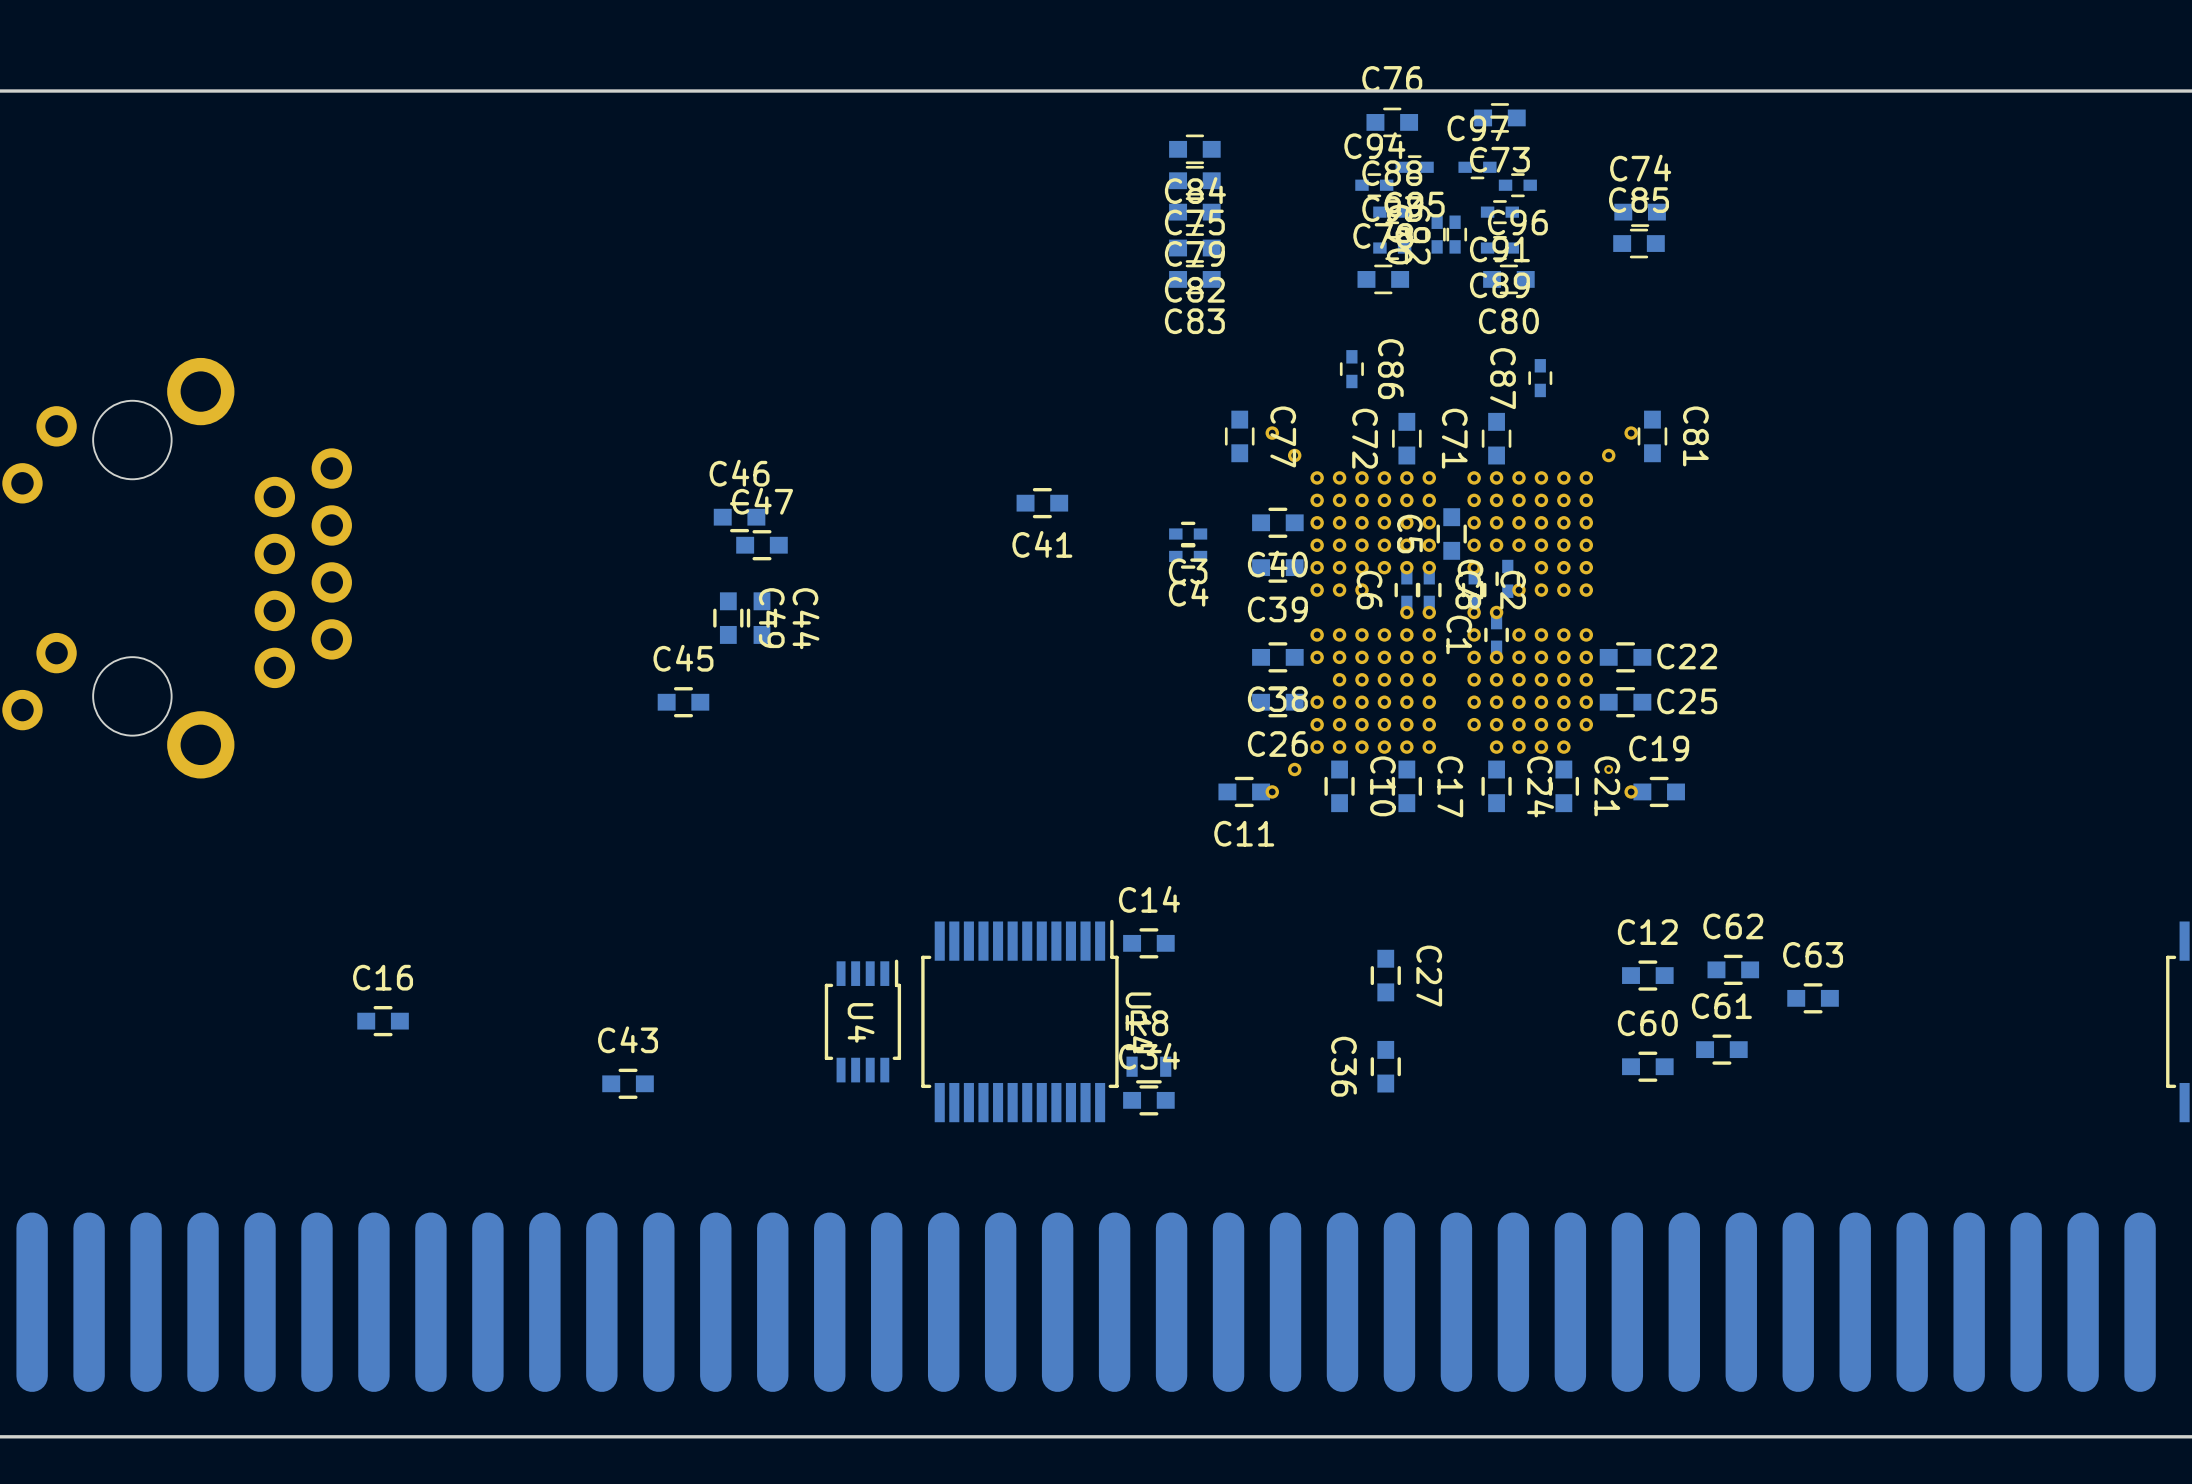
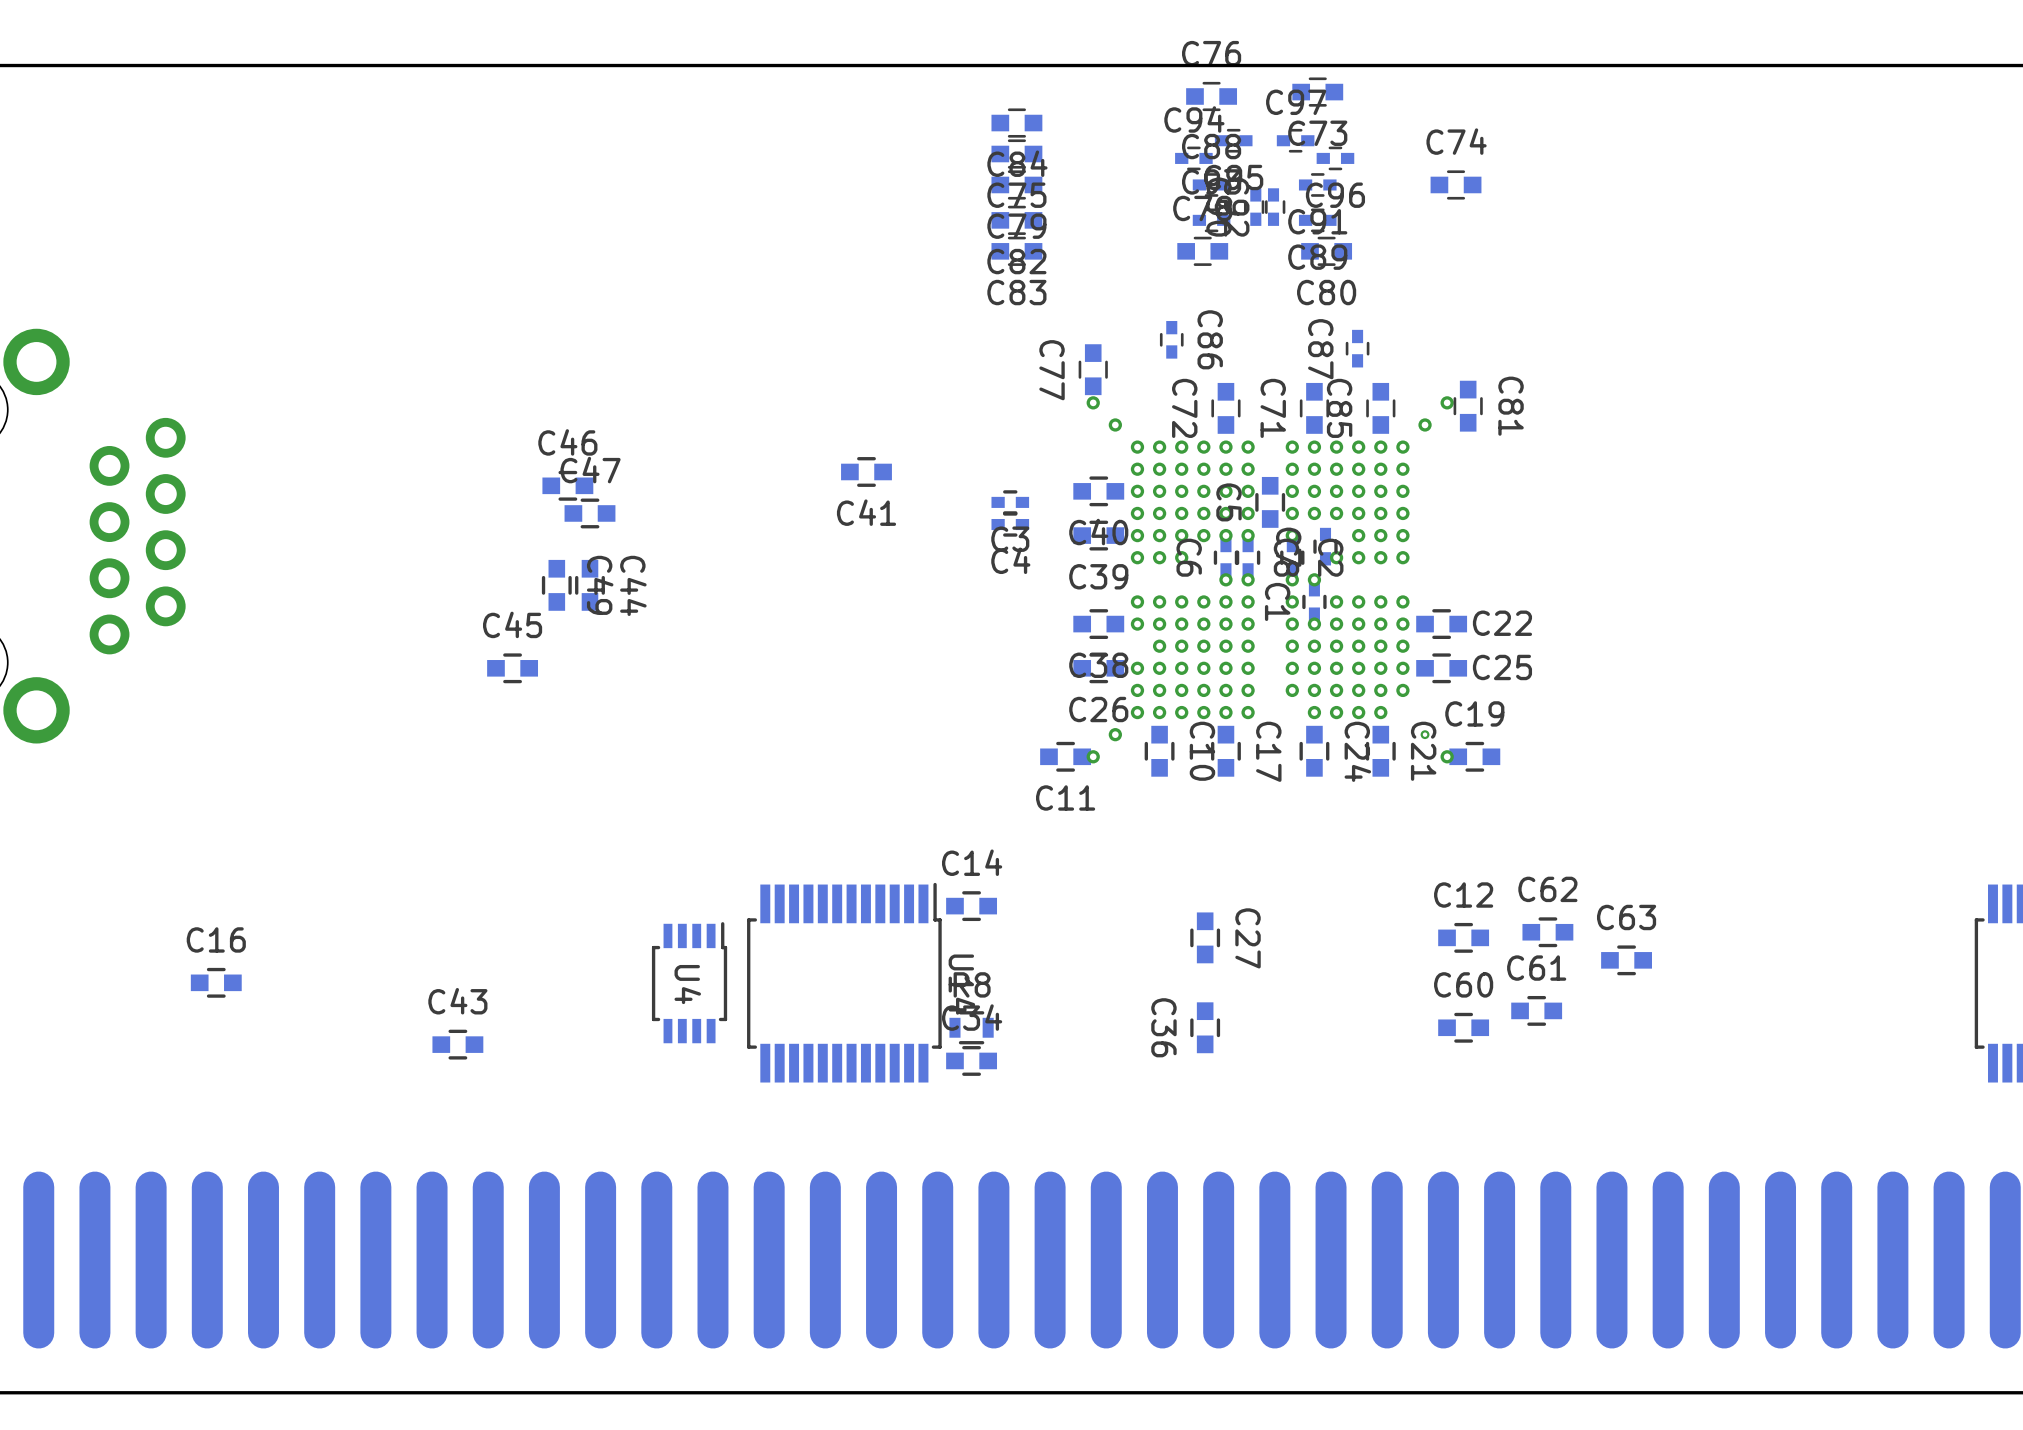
C85 name position: C85 (1639, 200) -> C85 (1339, 408)
C85 rotation: 0° (1639, 243) -> 90° clockwise (1380, 408)
C85 position: (1639, 243) -> (1380, 408)
C77 position: (1239, 436) -> (1093, 369)
C77 name position: C77 (1283, 436) -> C77 (1052, 370)

